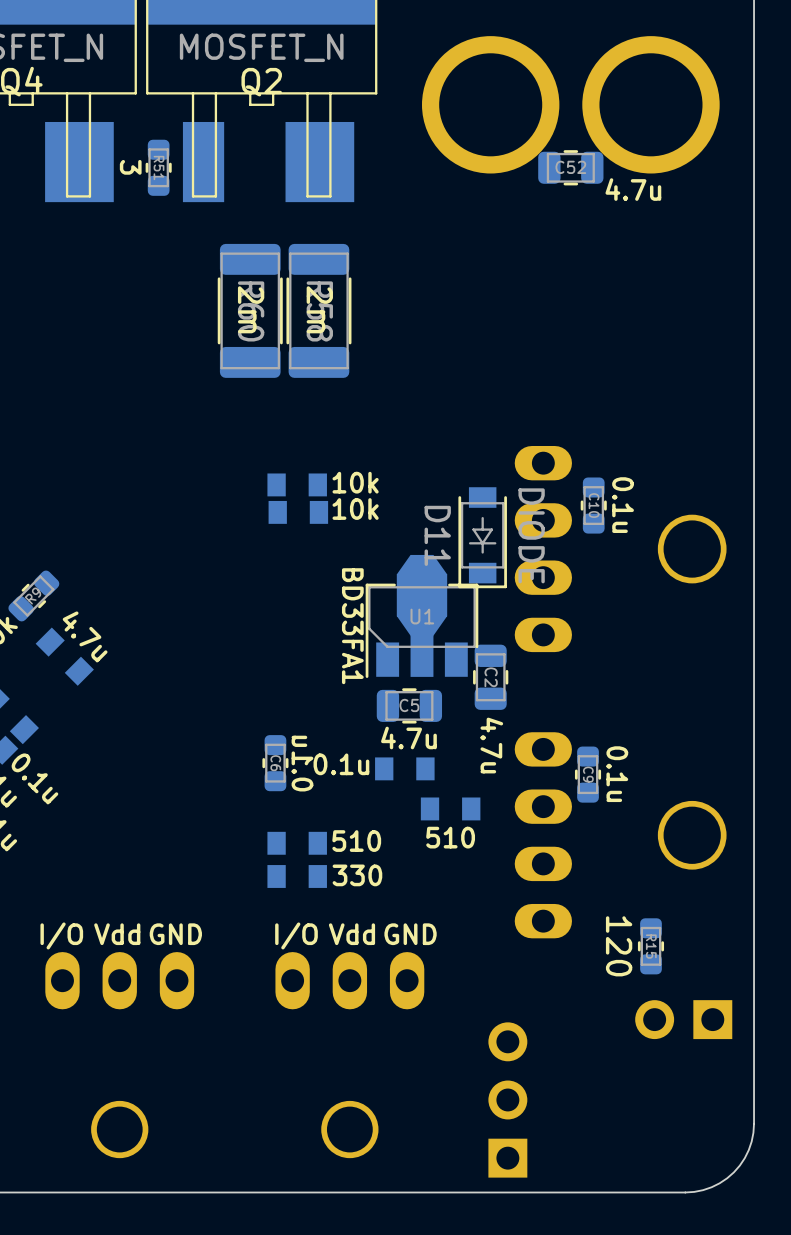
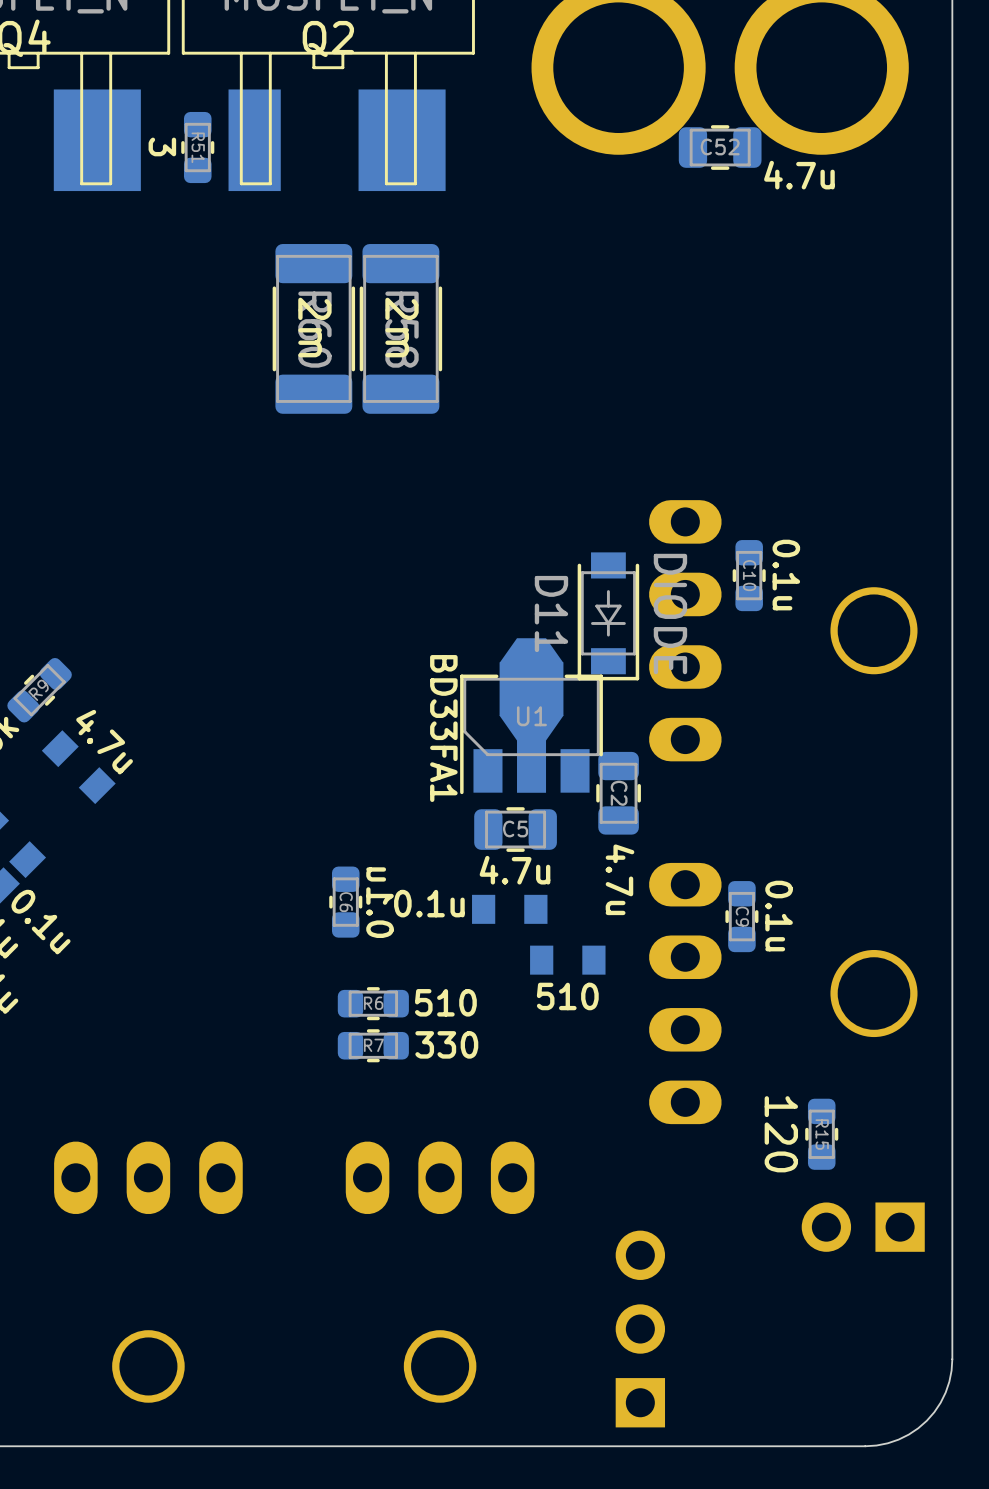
part: 10k (297, 484) -> none
part: 10k (298, 512) -> none
part: 510 (297, 843) -> none
R6: none -> 510 (373, 1003)
part: 330 (297, 876) -> none
R7: none -> 330 (373, 1045)
text: Vdd (117, 934) -> none
text: GND (175, 934) -> none
text: Vdd (351, 934) -> none
text: GND (410, 934) -> none
text: I/O (61, 935) -> none
text: I/O (296, 935) -> none

